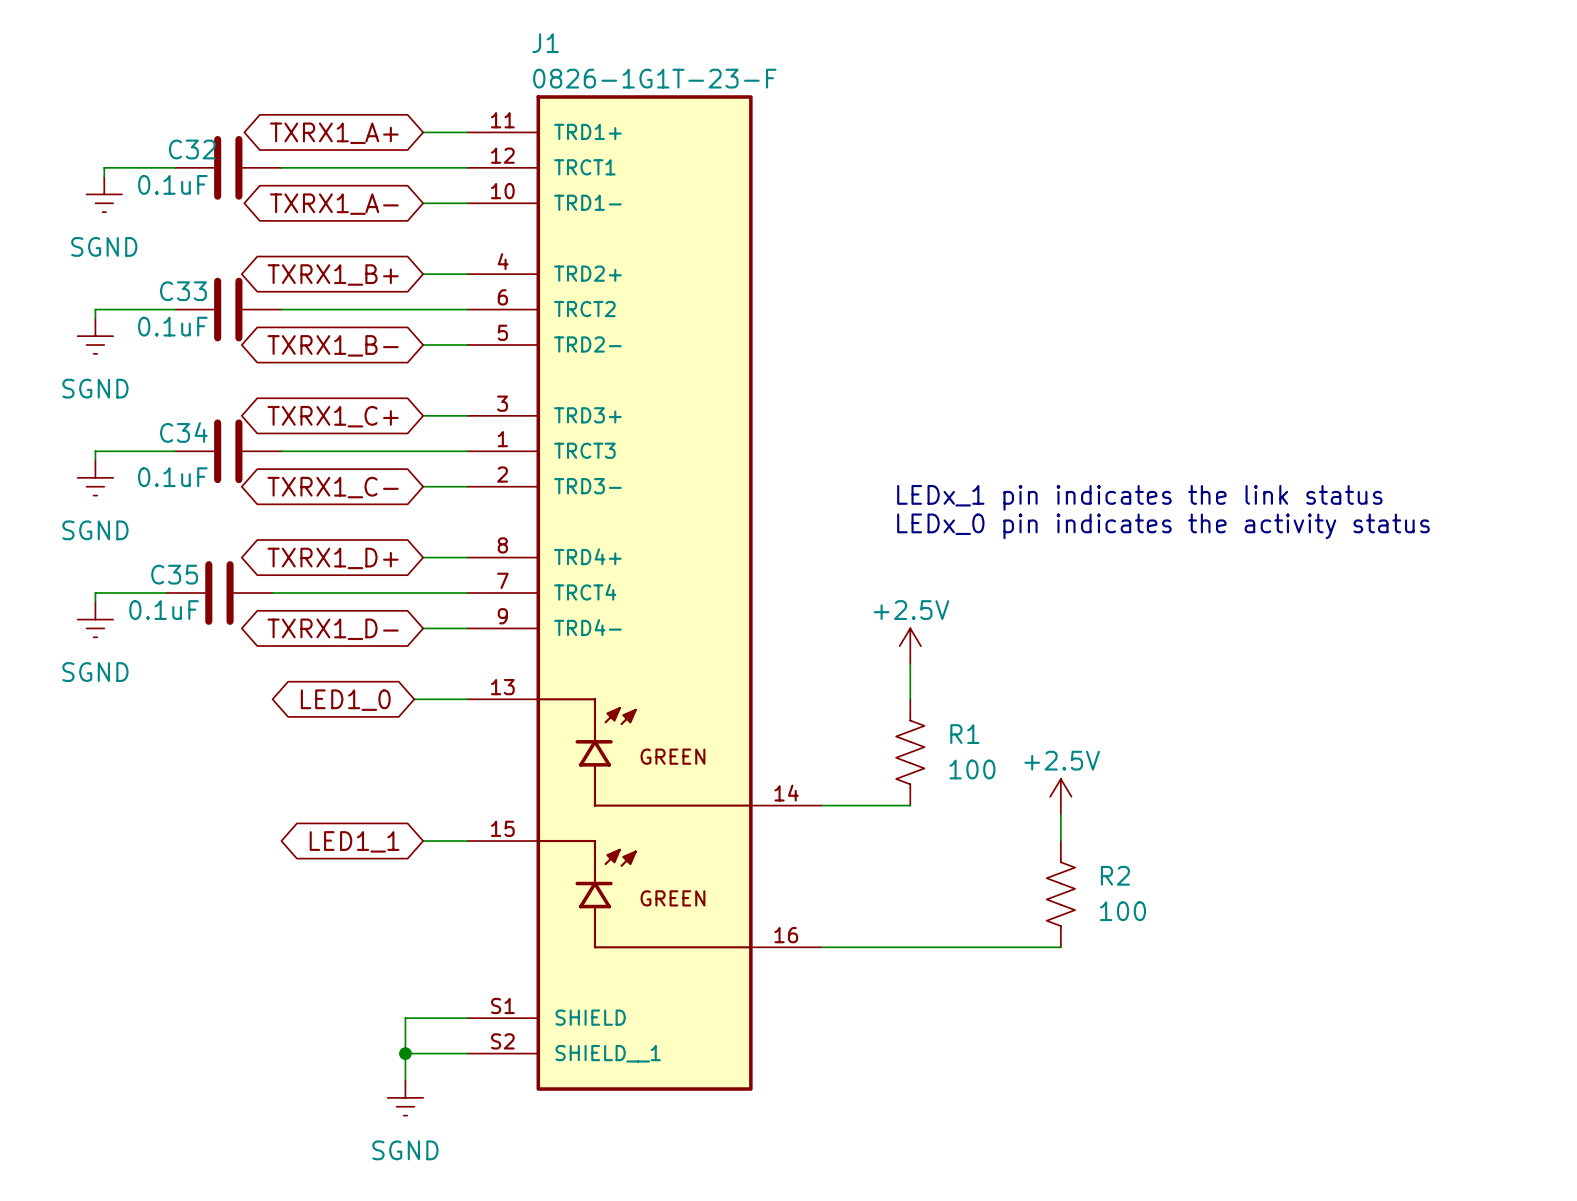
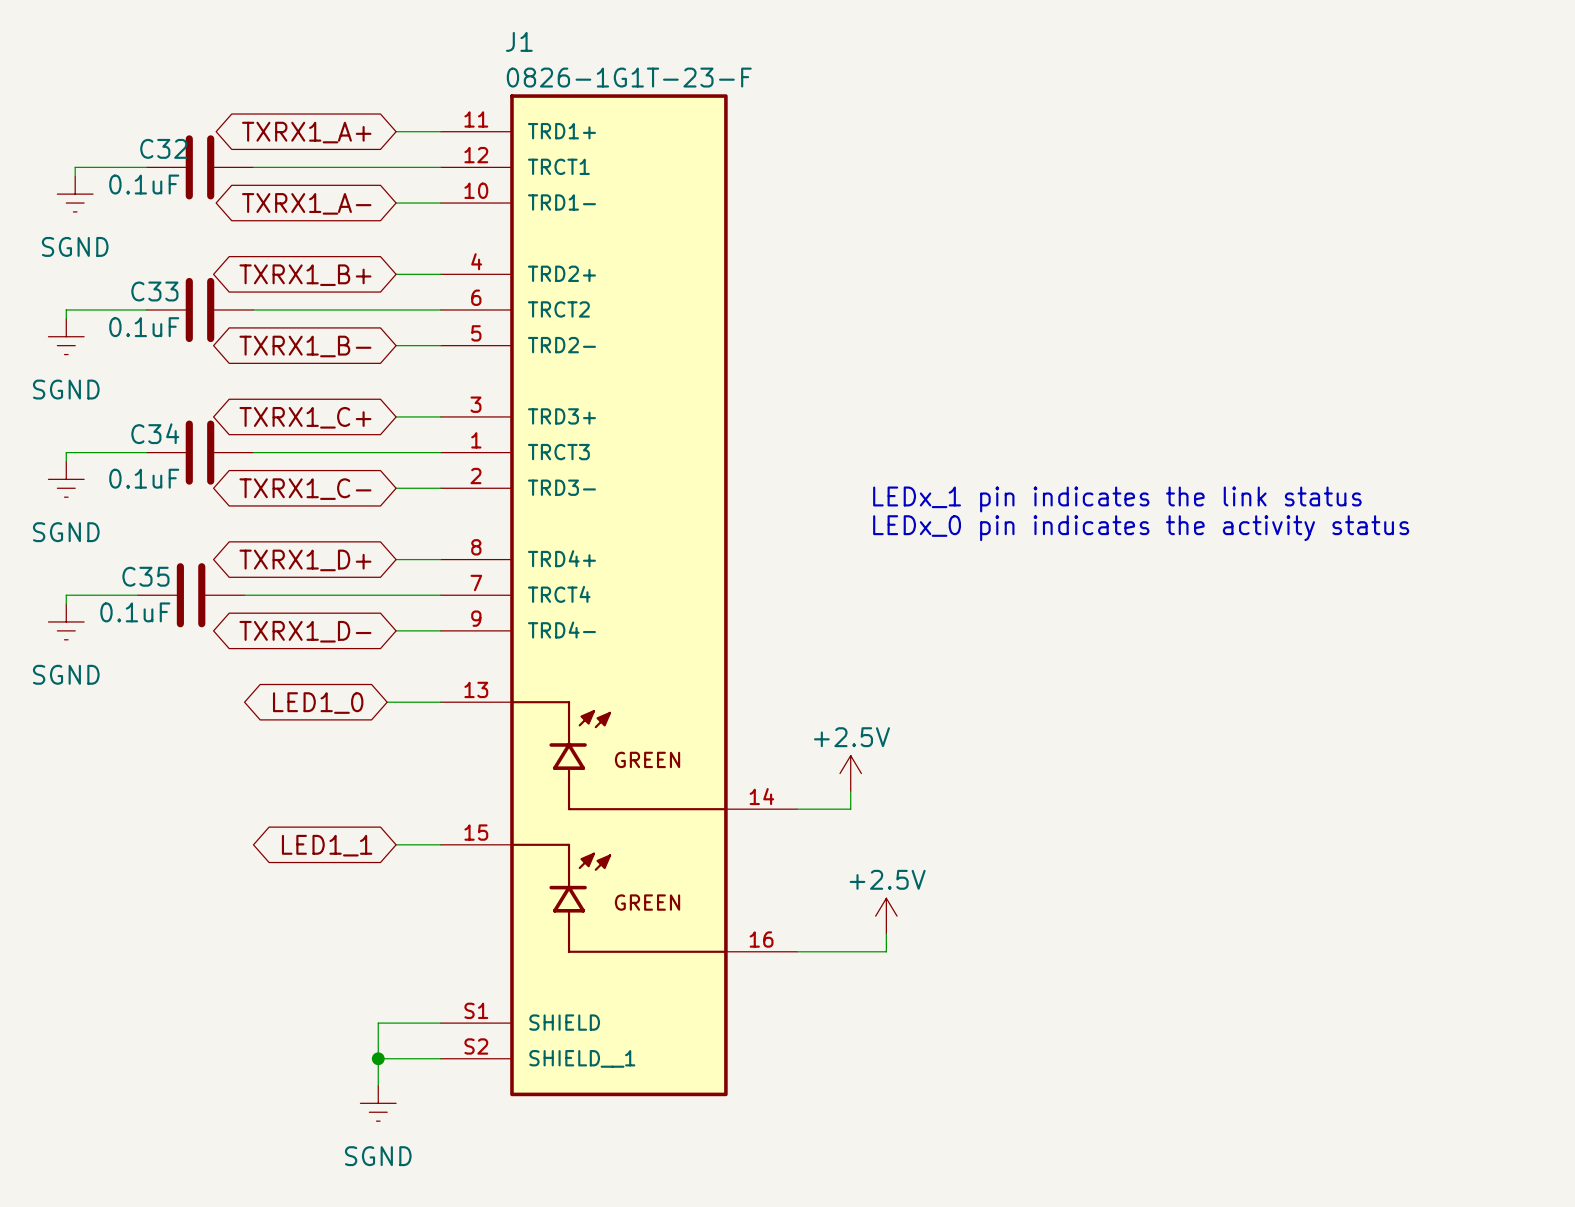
power symbol: +2.5V (910, 646) -> none
wire: (910, 663) (910, 699) -> none
R1: 100 (910, 752) -> none
power symbol: none -> +2.5V (850, 773)
power symbol: +2.5V (1060, 796) -> none
wire: (874, 805) (910, 805) -> (850, 809) (850, 791)
wire: (1060, 814) (1060, 841) -> none
R2: 100 (1060, 894) -> none
power symbol: none -> +2.5V (886, 916)
wire: (910, 947) (1060, 947) -> (886, 951) (886, 933)

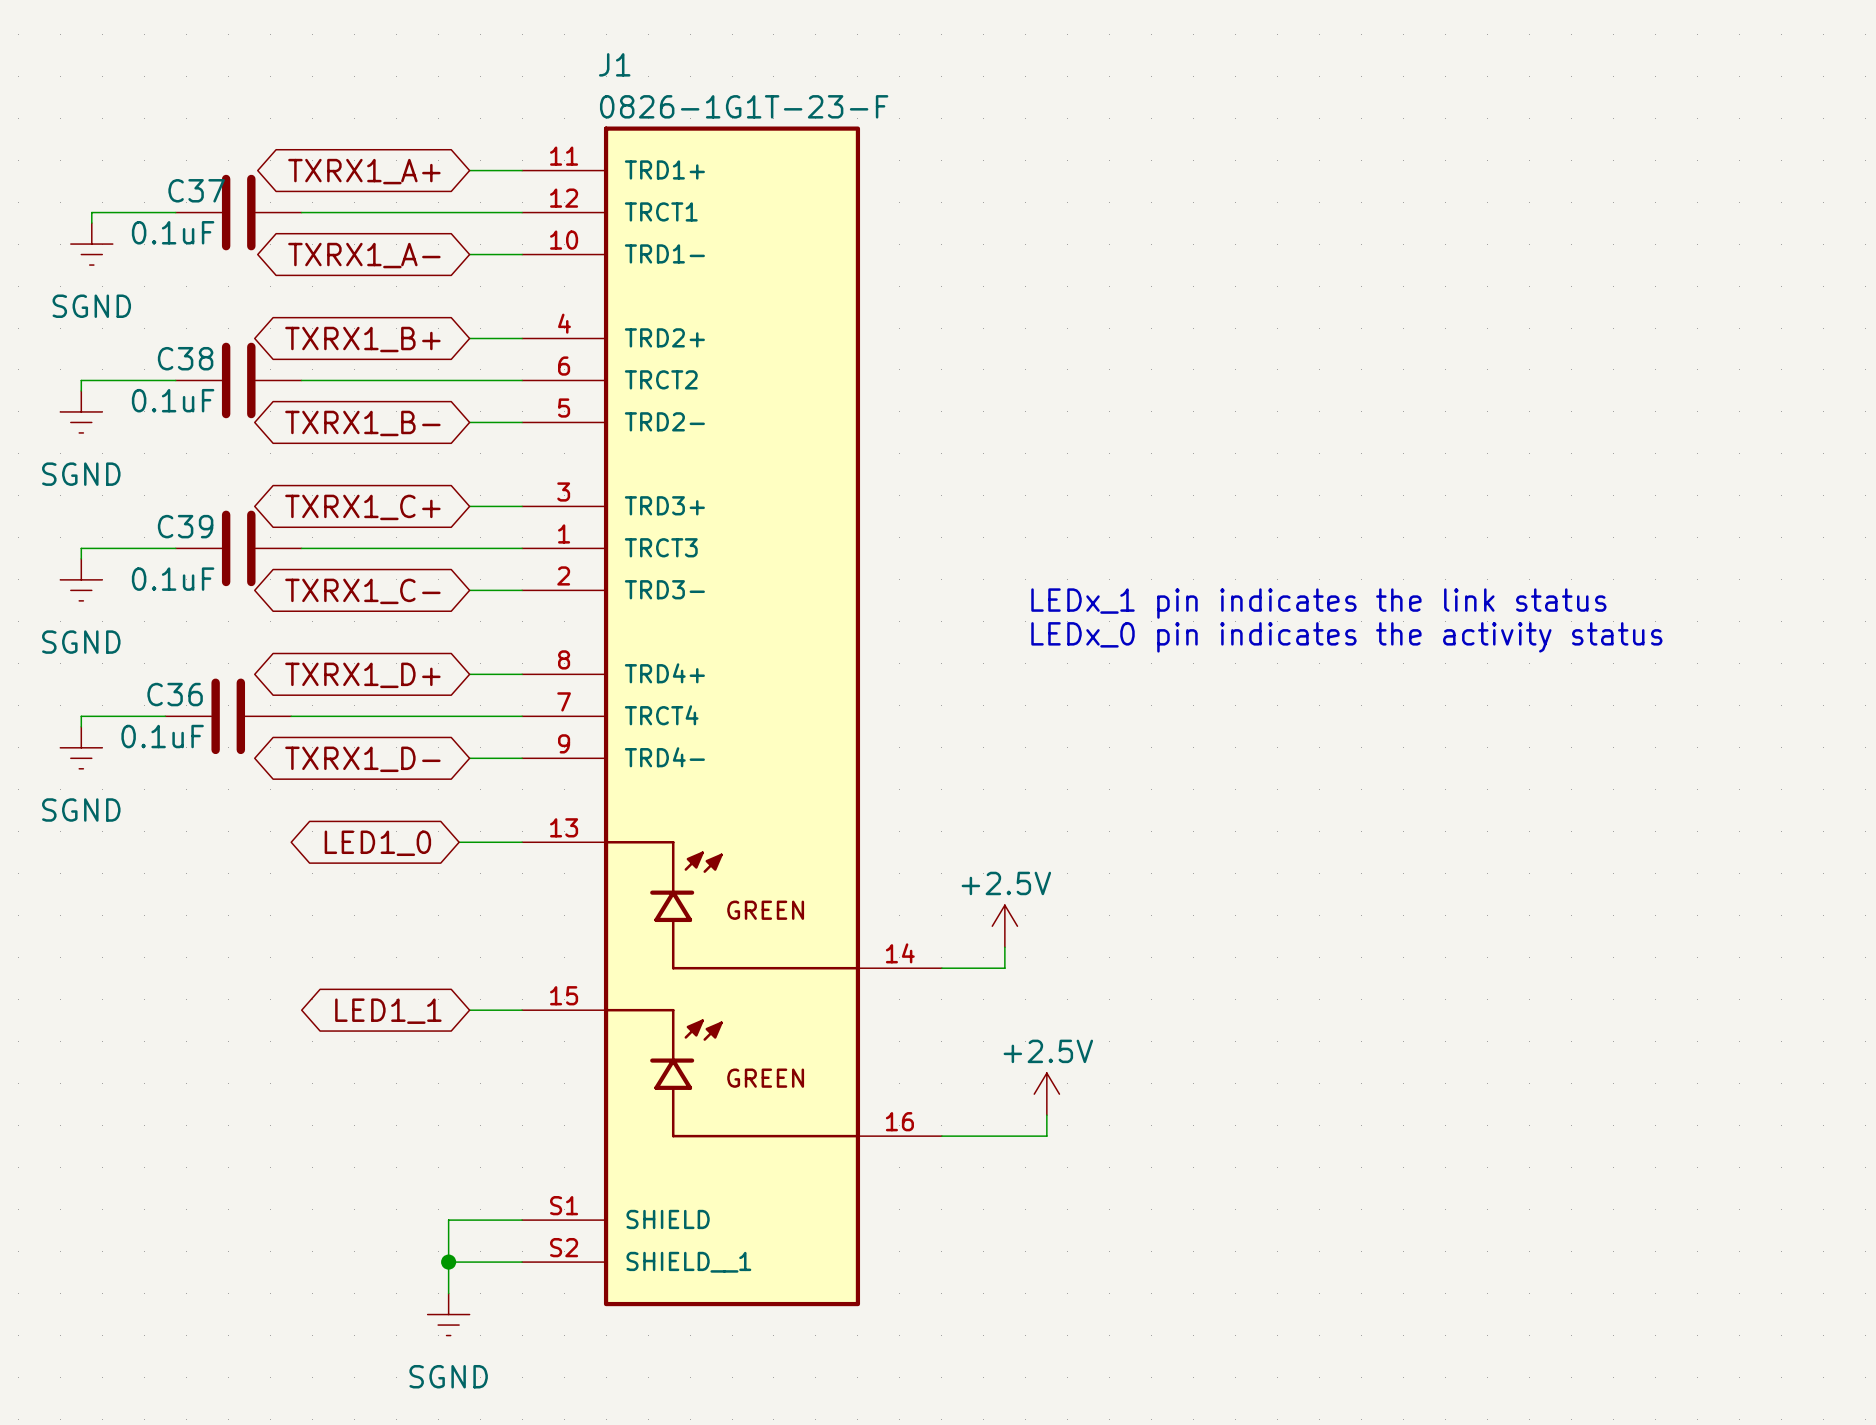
C32 name: C32 (163, 148) -> C37 (196, 190)
C33 name: C33 (154, 291) -> C38 (185, 358)
C34 name: C34 (155, 433) -> C39 (185, 526)
C35 name: C35 (145, 576) -> C36 (175, 694)

